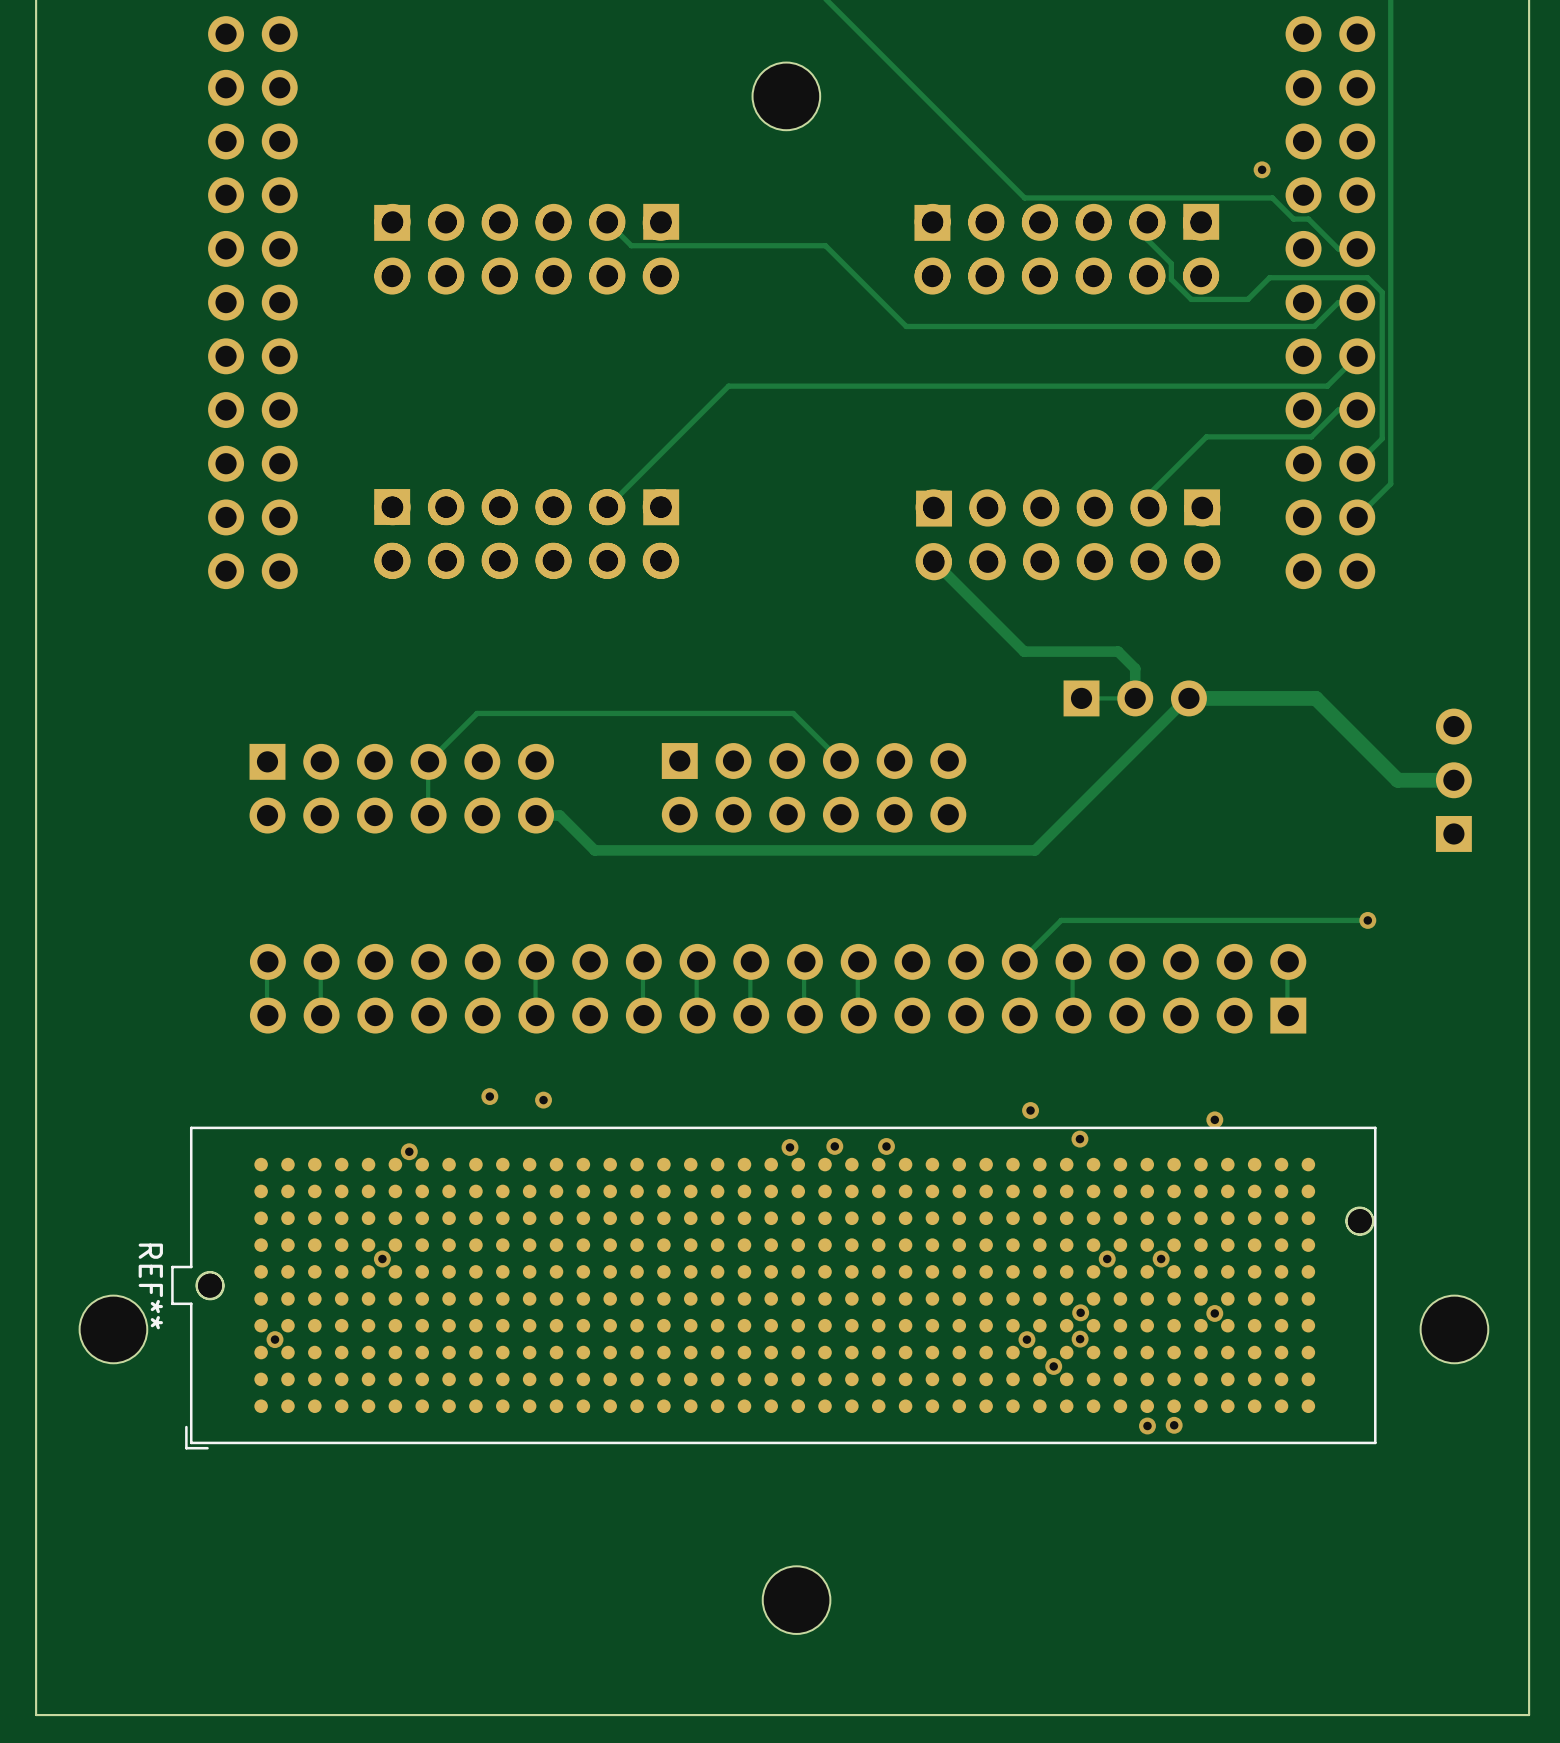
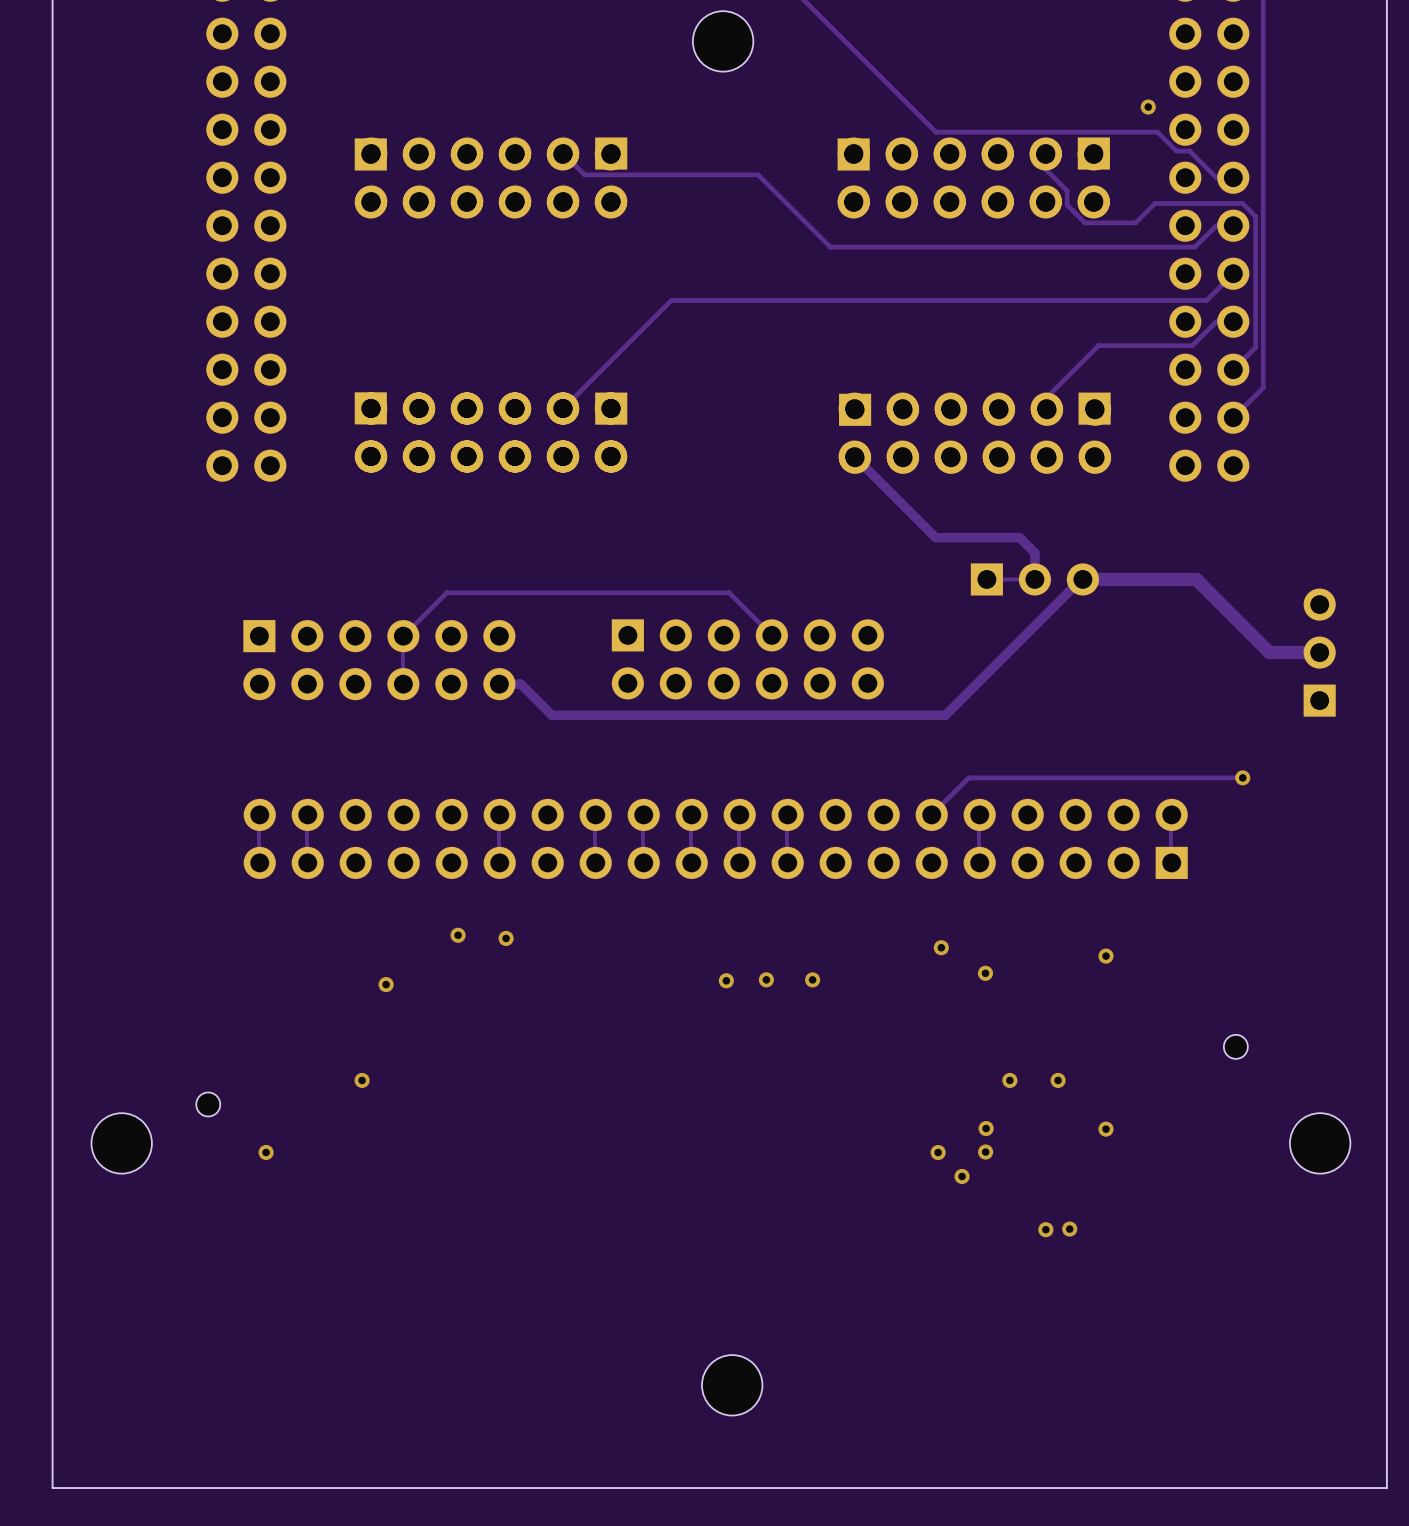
REF**: (773, 1288) -> none

